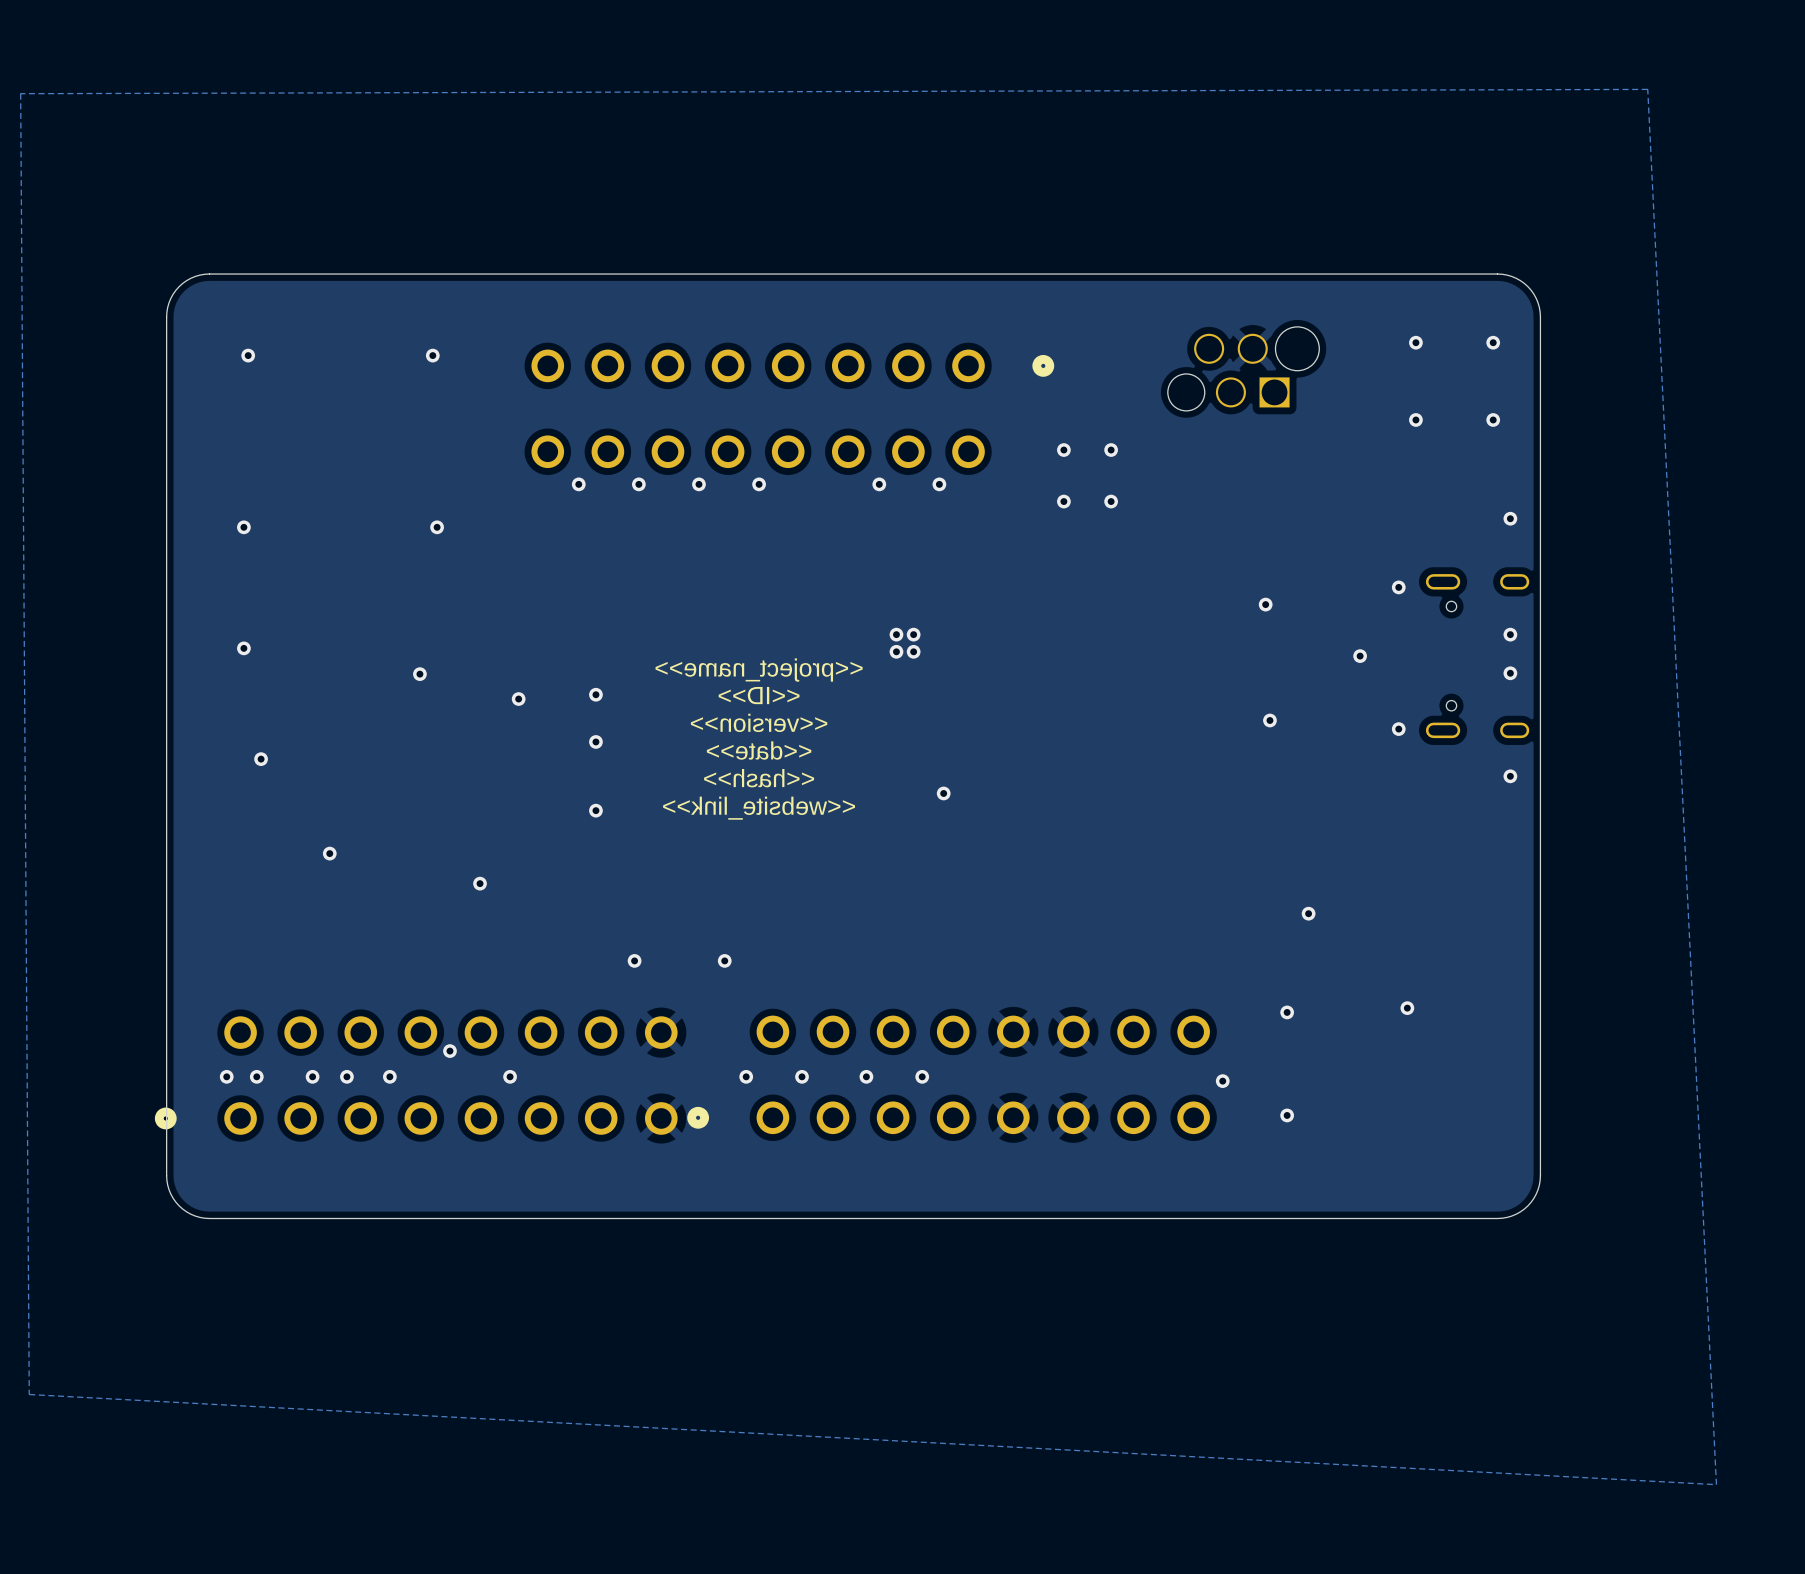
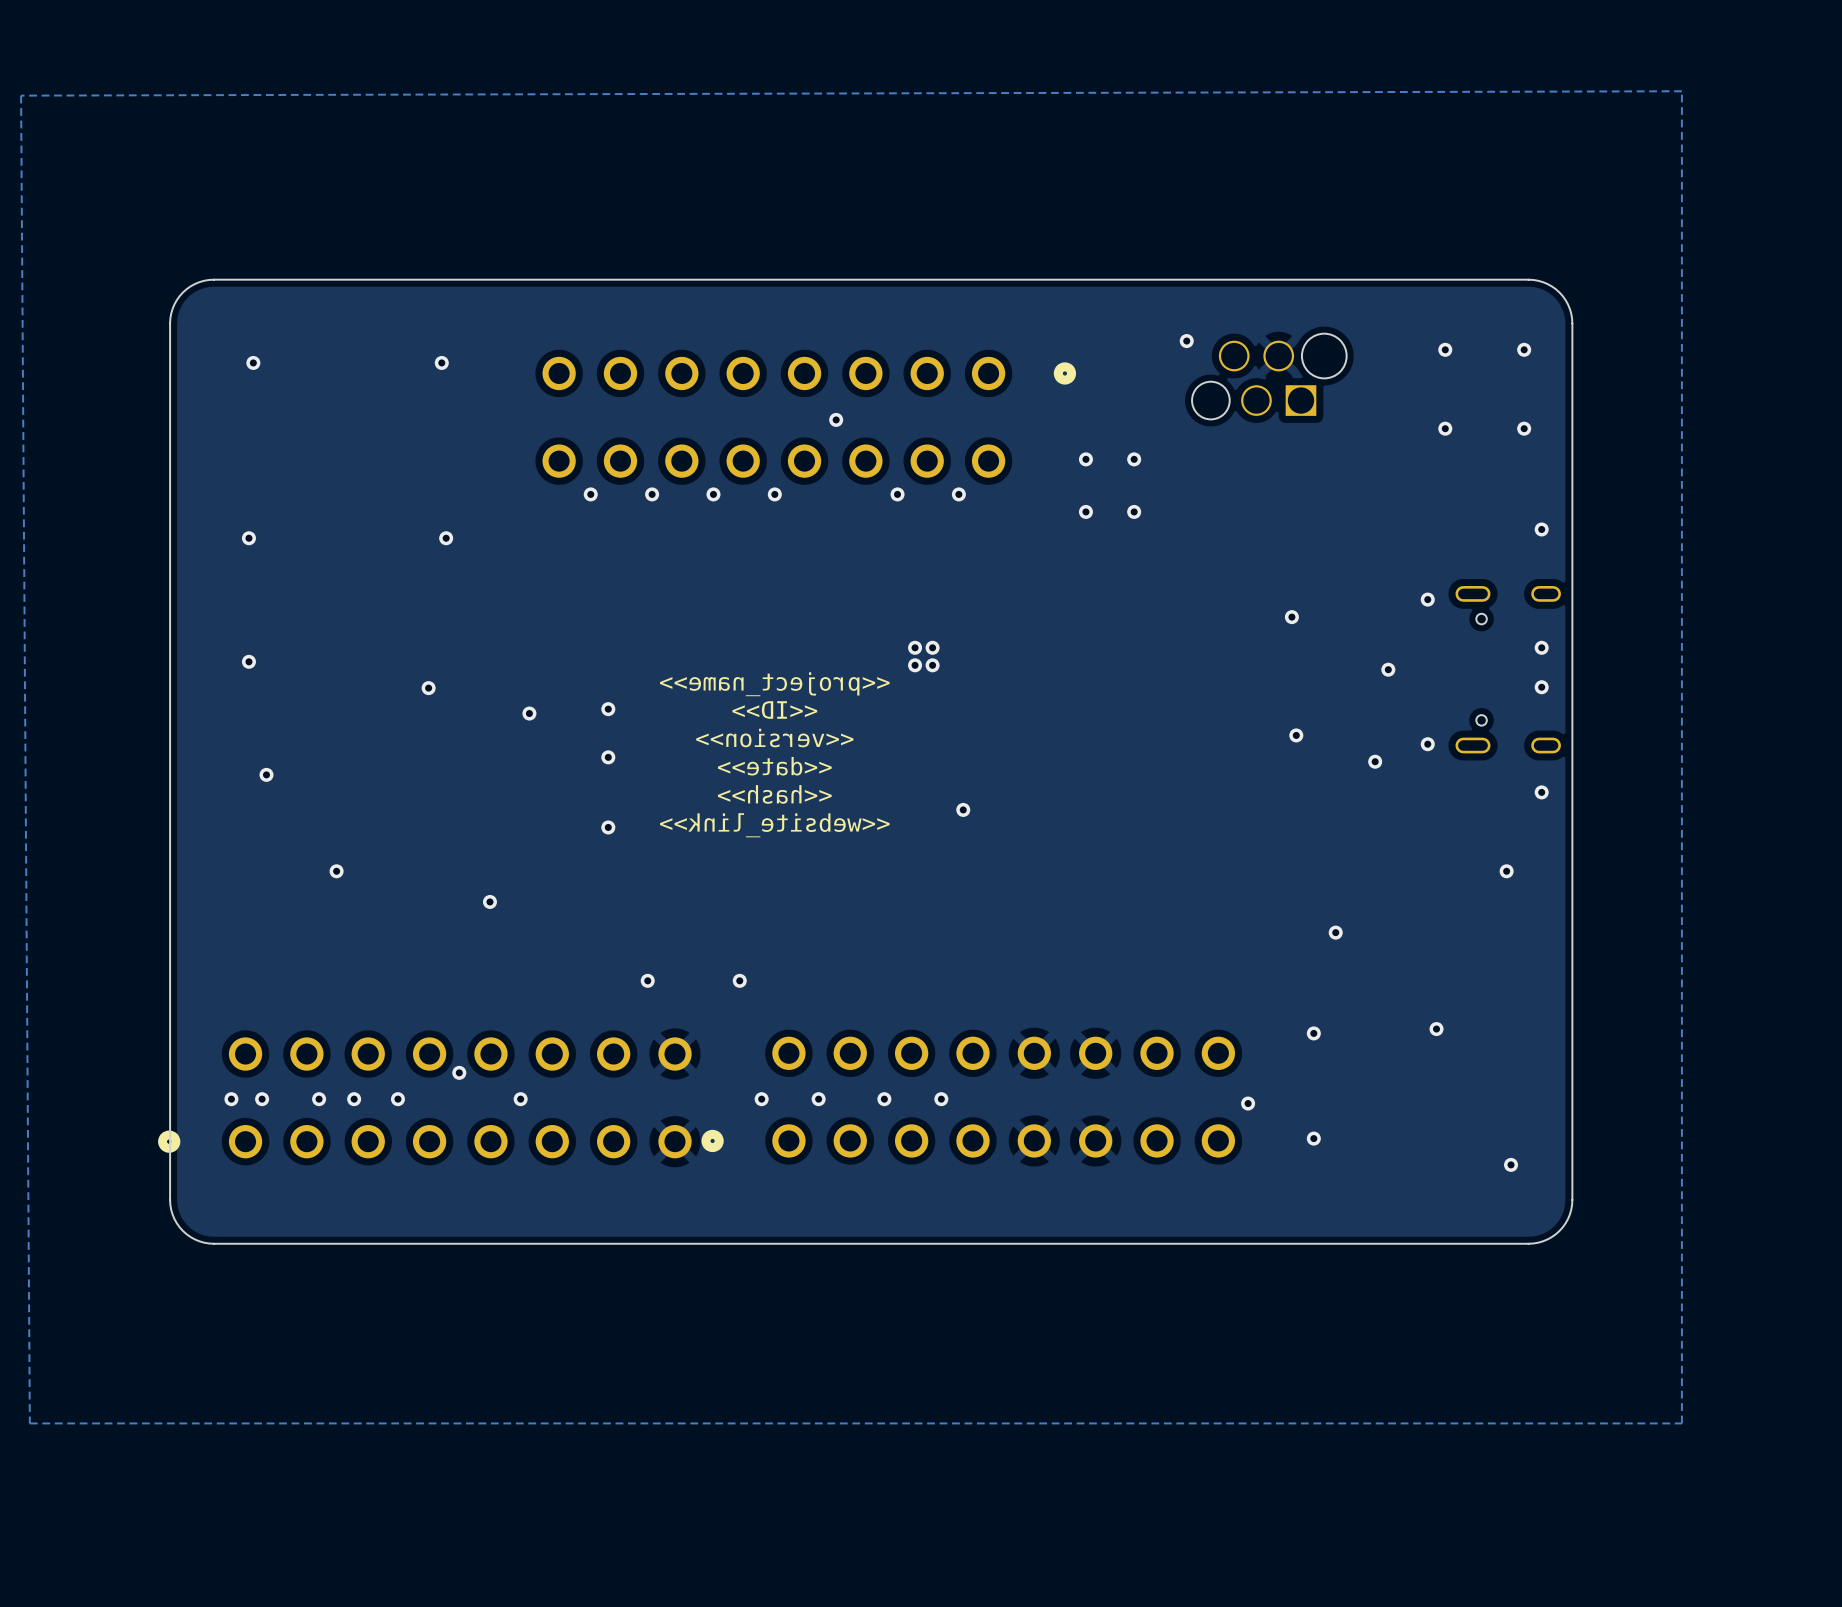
zone outline: (1647, 89) (1716, 1484) (29, 1394) -> (1681, 91) (1681, 1423) (29, 1423)
via: none -> (1186, 341)
via: none -> (836, 419)
via: none -> (1375, 761)
via: none -> (1506, 871)
via: none -> (1511, 1164)

